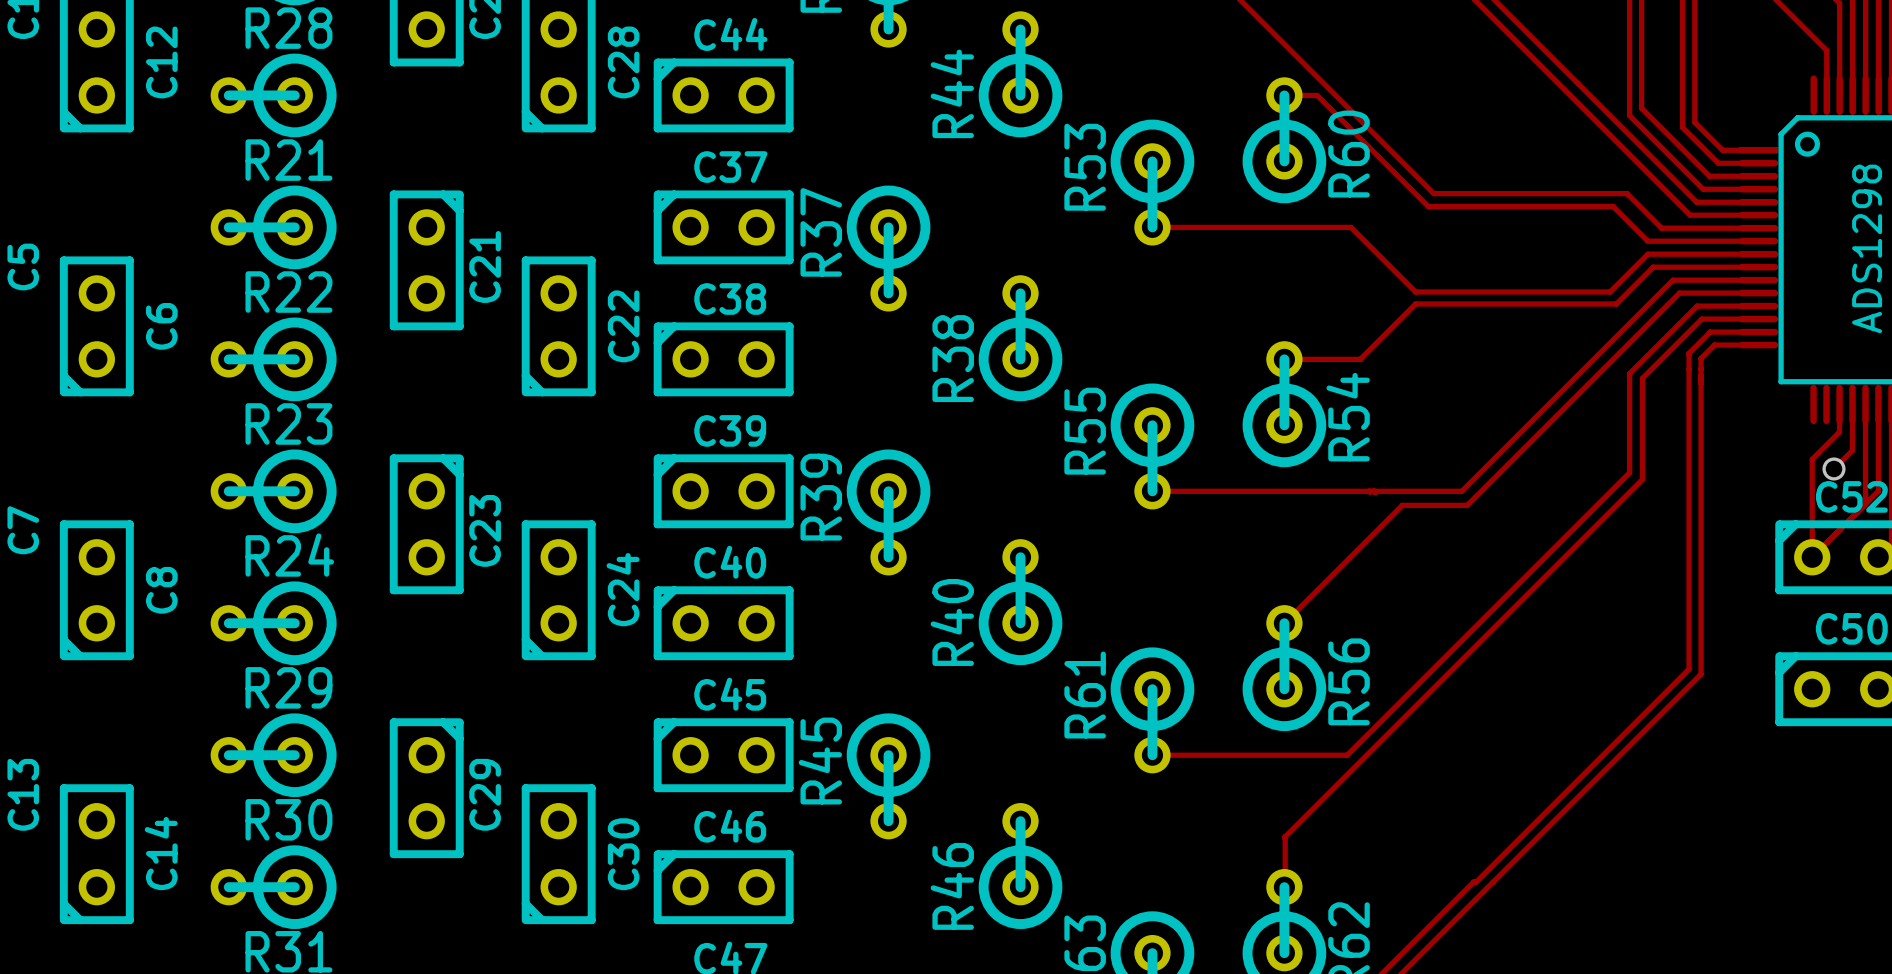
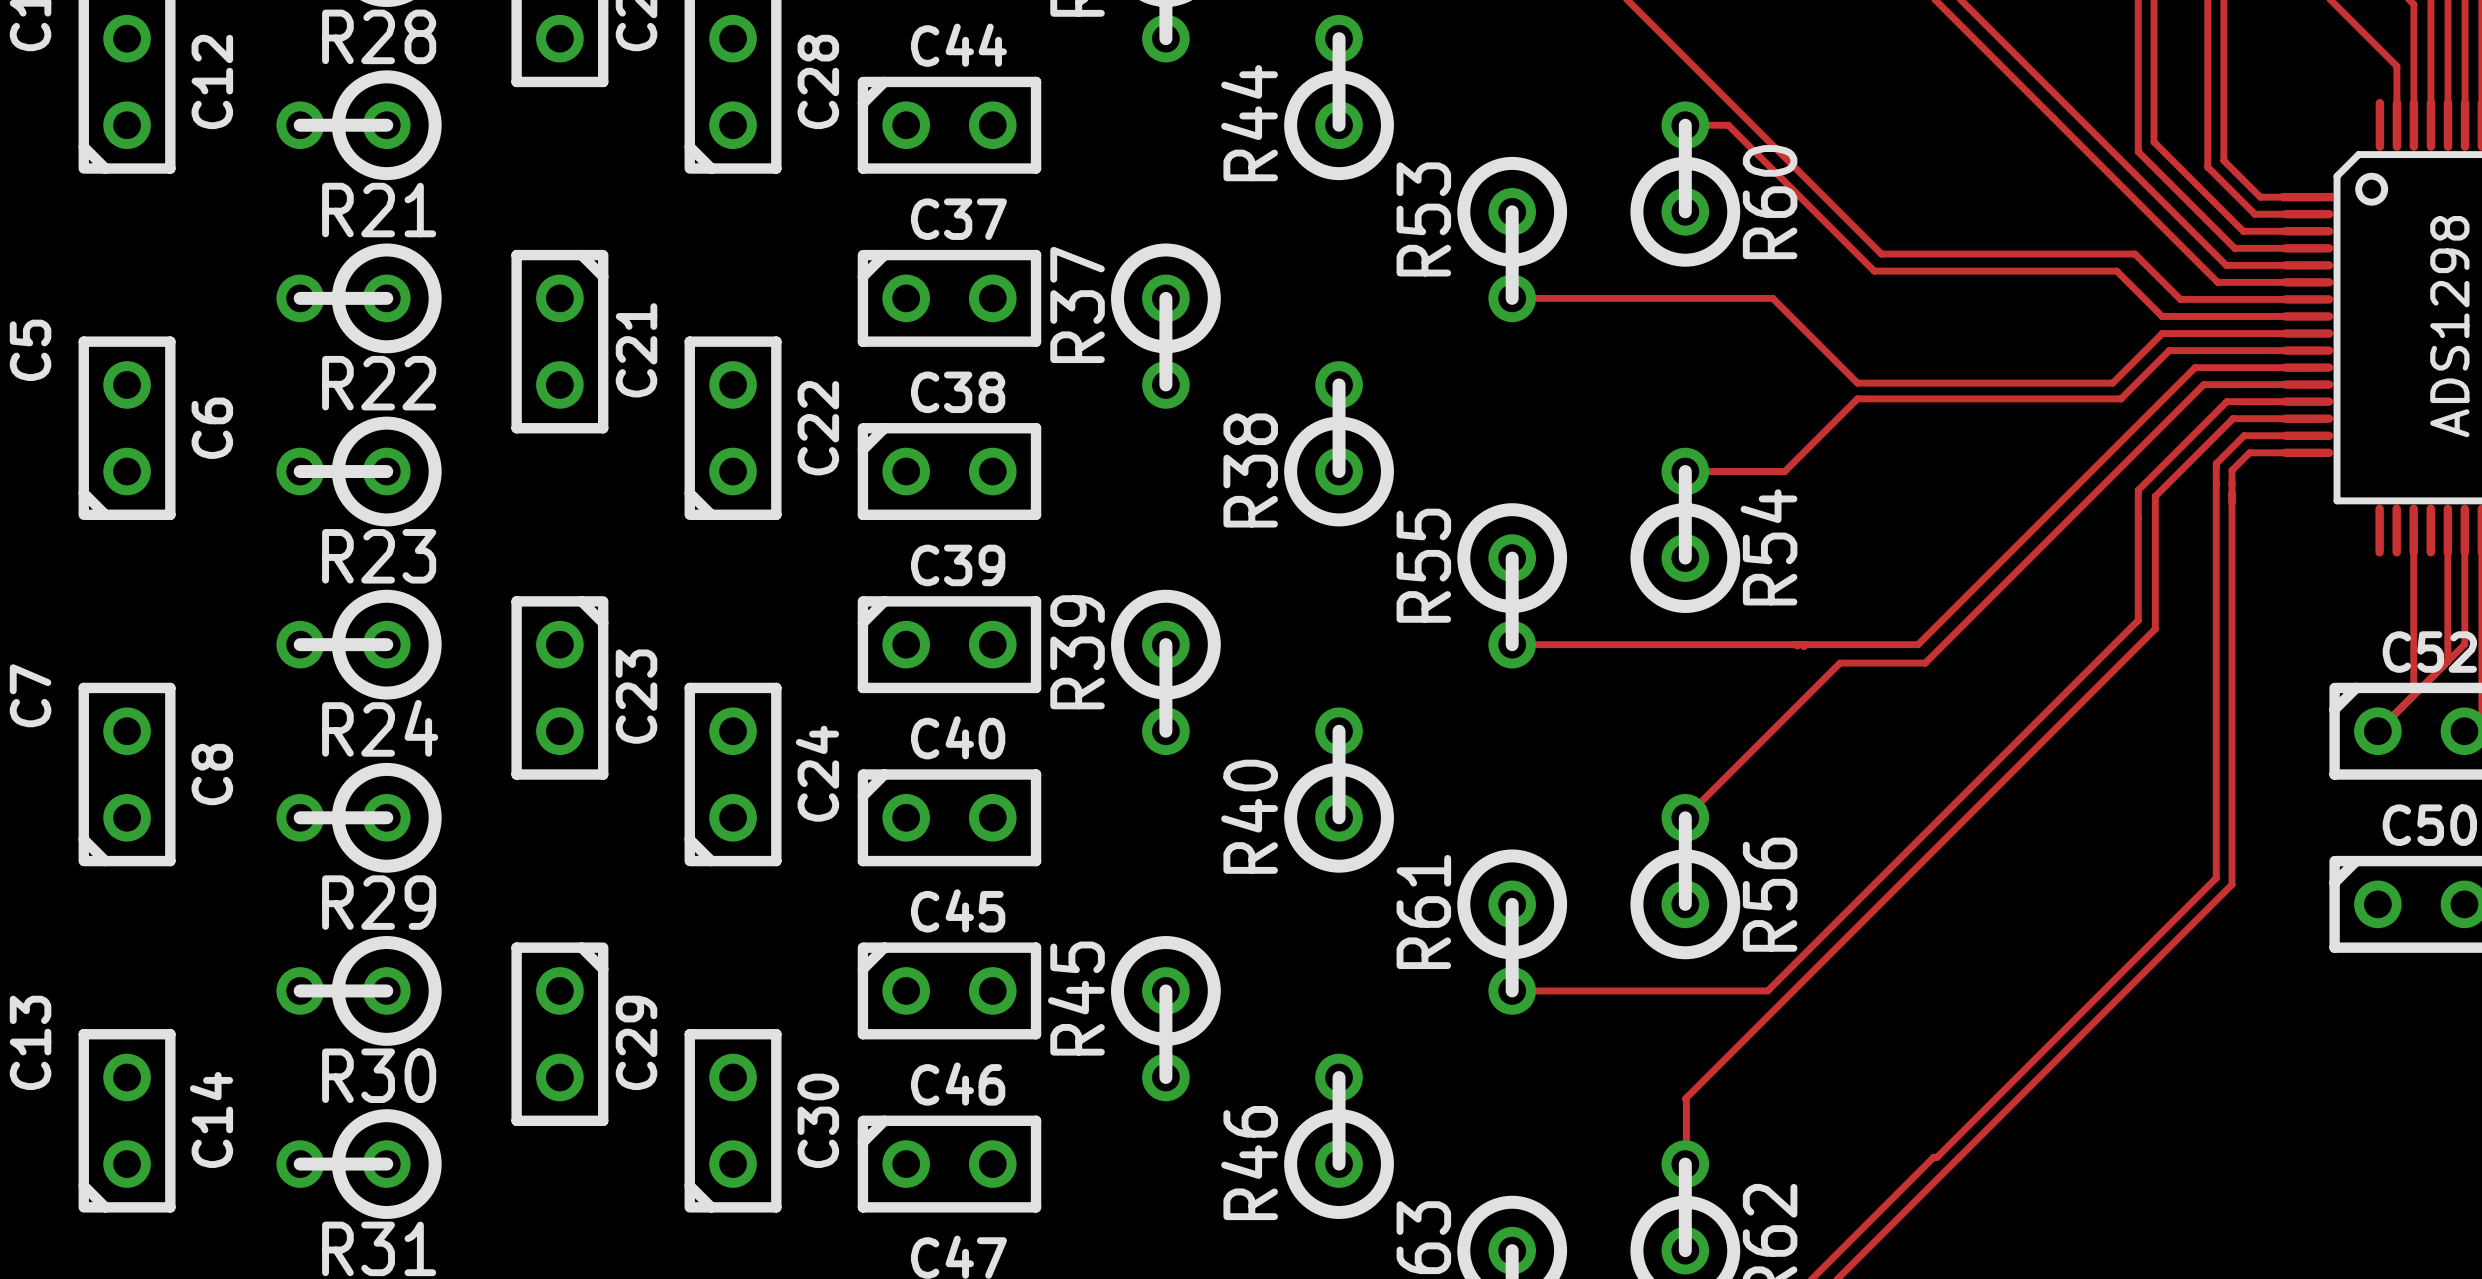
top track: (1852, 404) (1852, 450) (1834, 469) -> none
top track: (1839, 432) (1812, 459) (1812, 557) -> (2413, 566) (2413, 695)
via: (1834, 469) -> none

